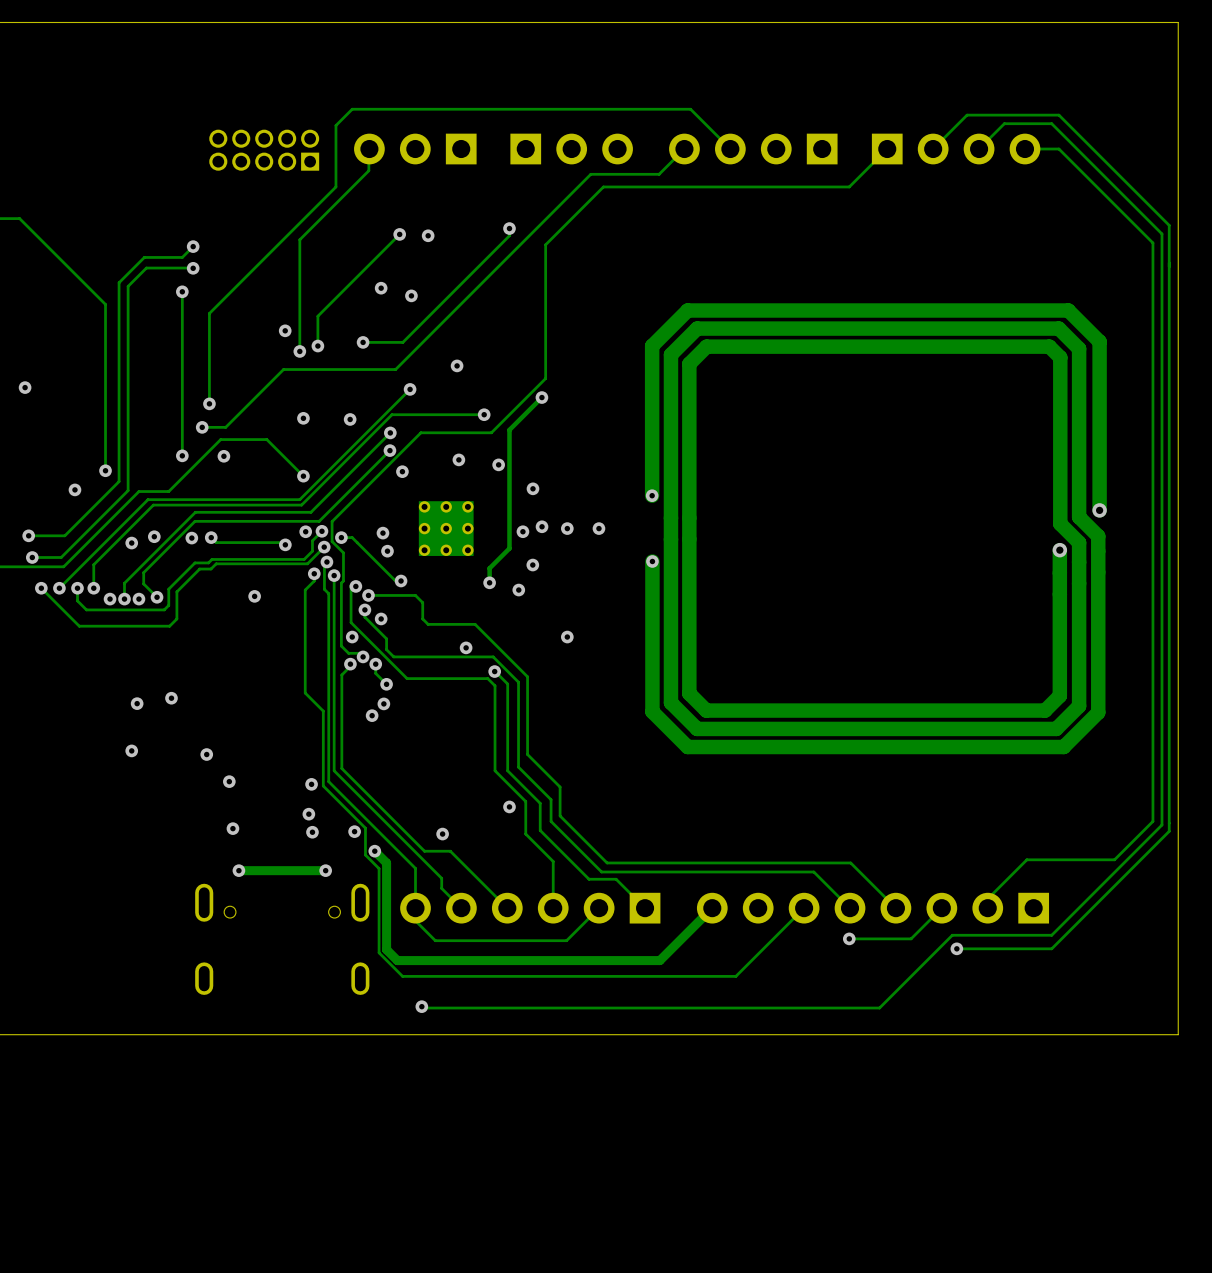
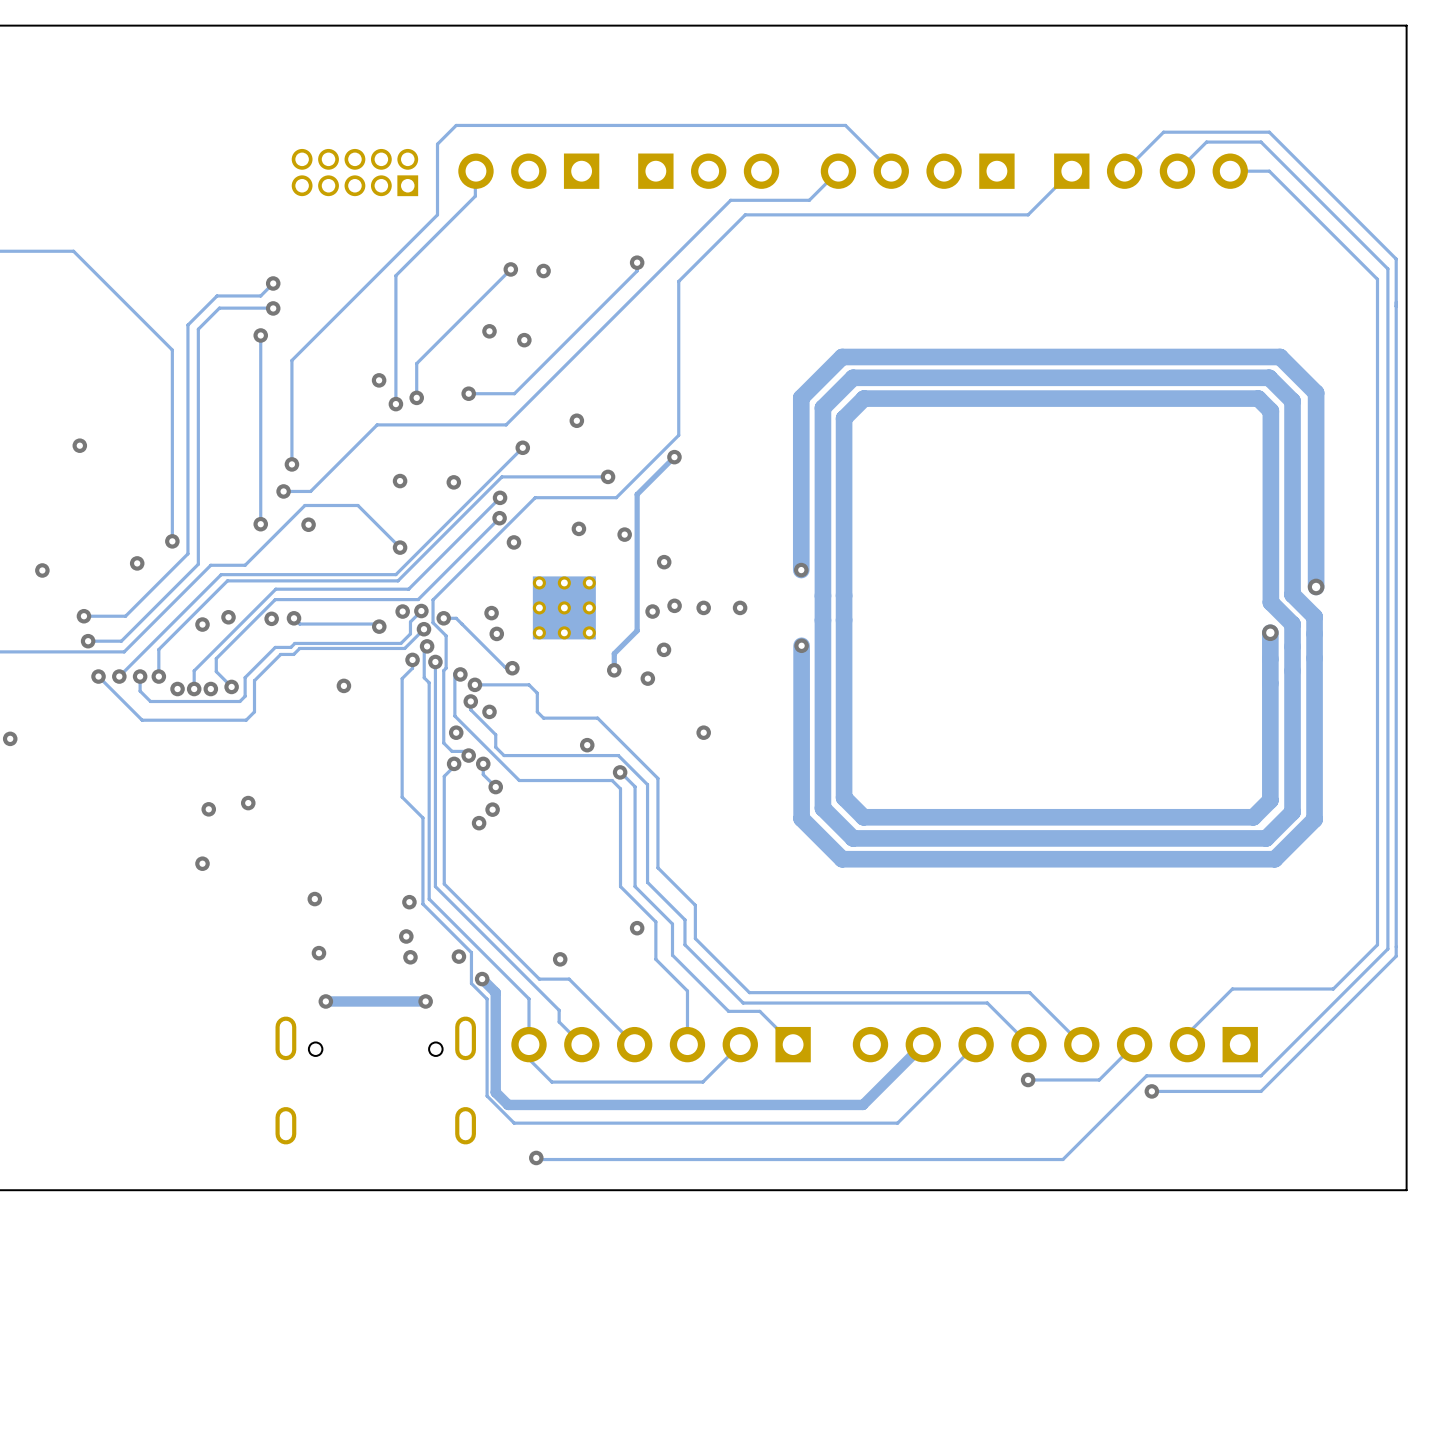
via: (206, 754) -> none
track: (712, 908) (659, 960) -> (923, 1044) (862, 1104) (810, 1104)

